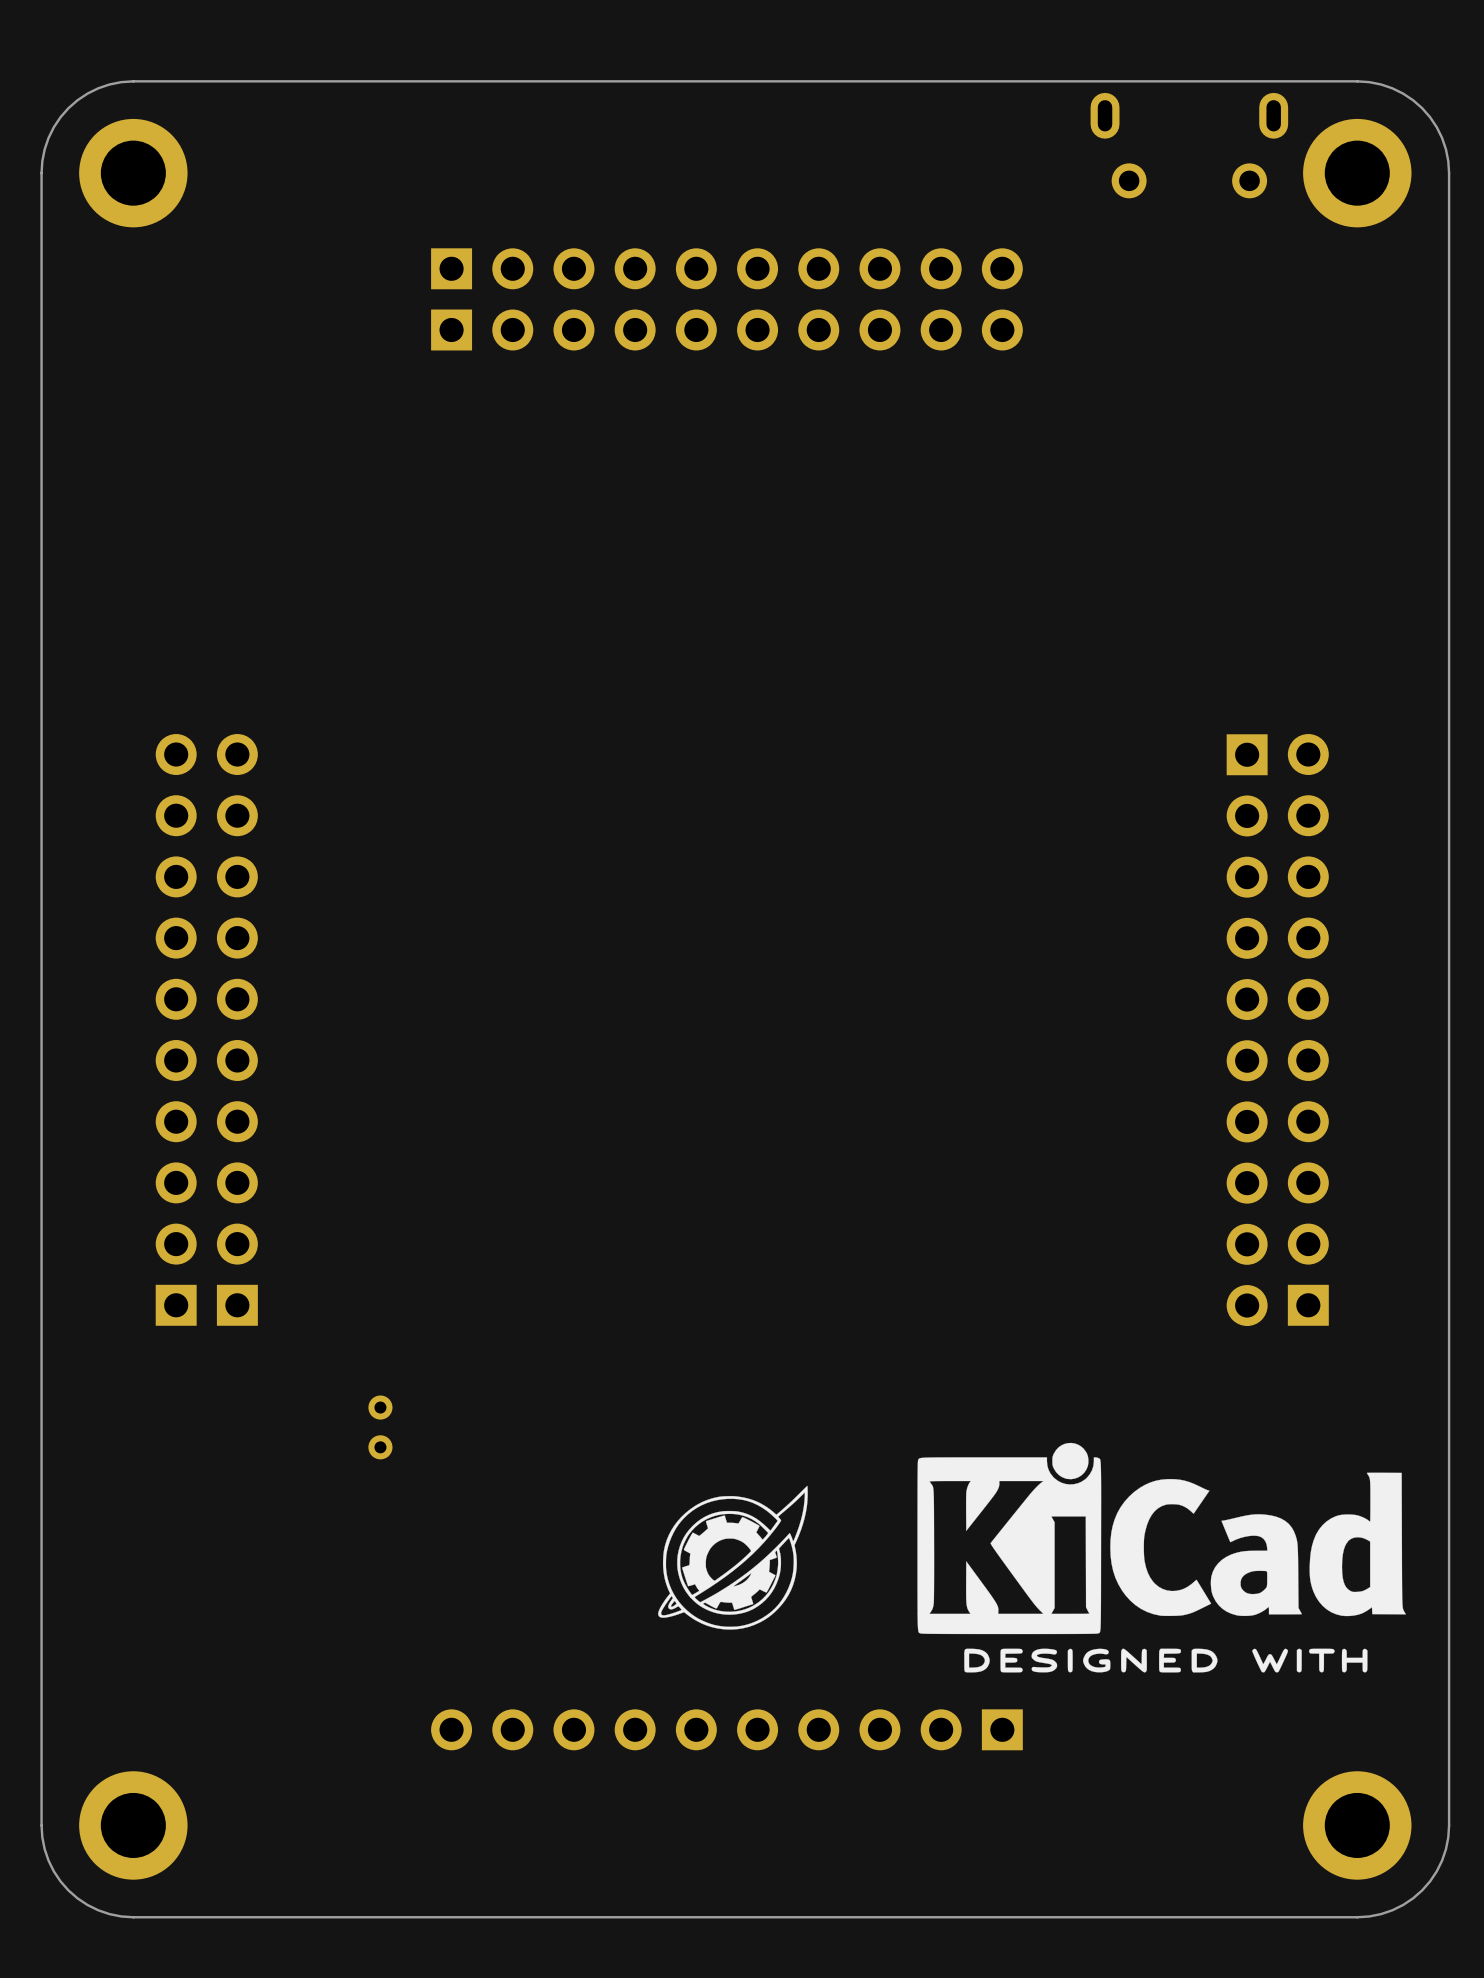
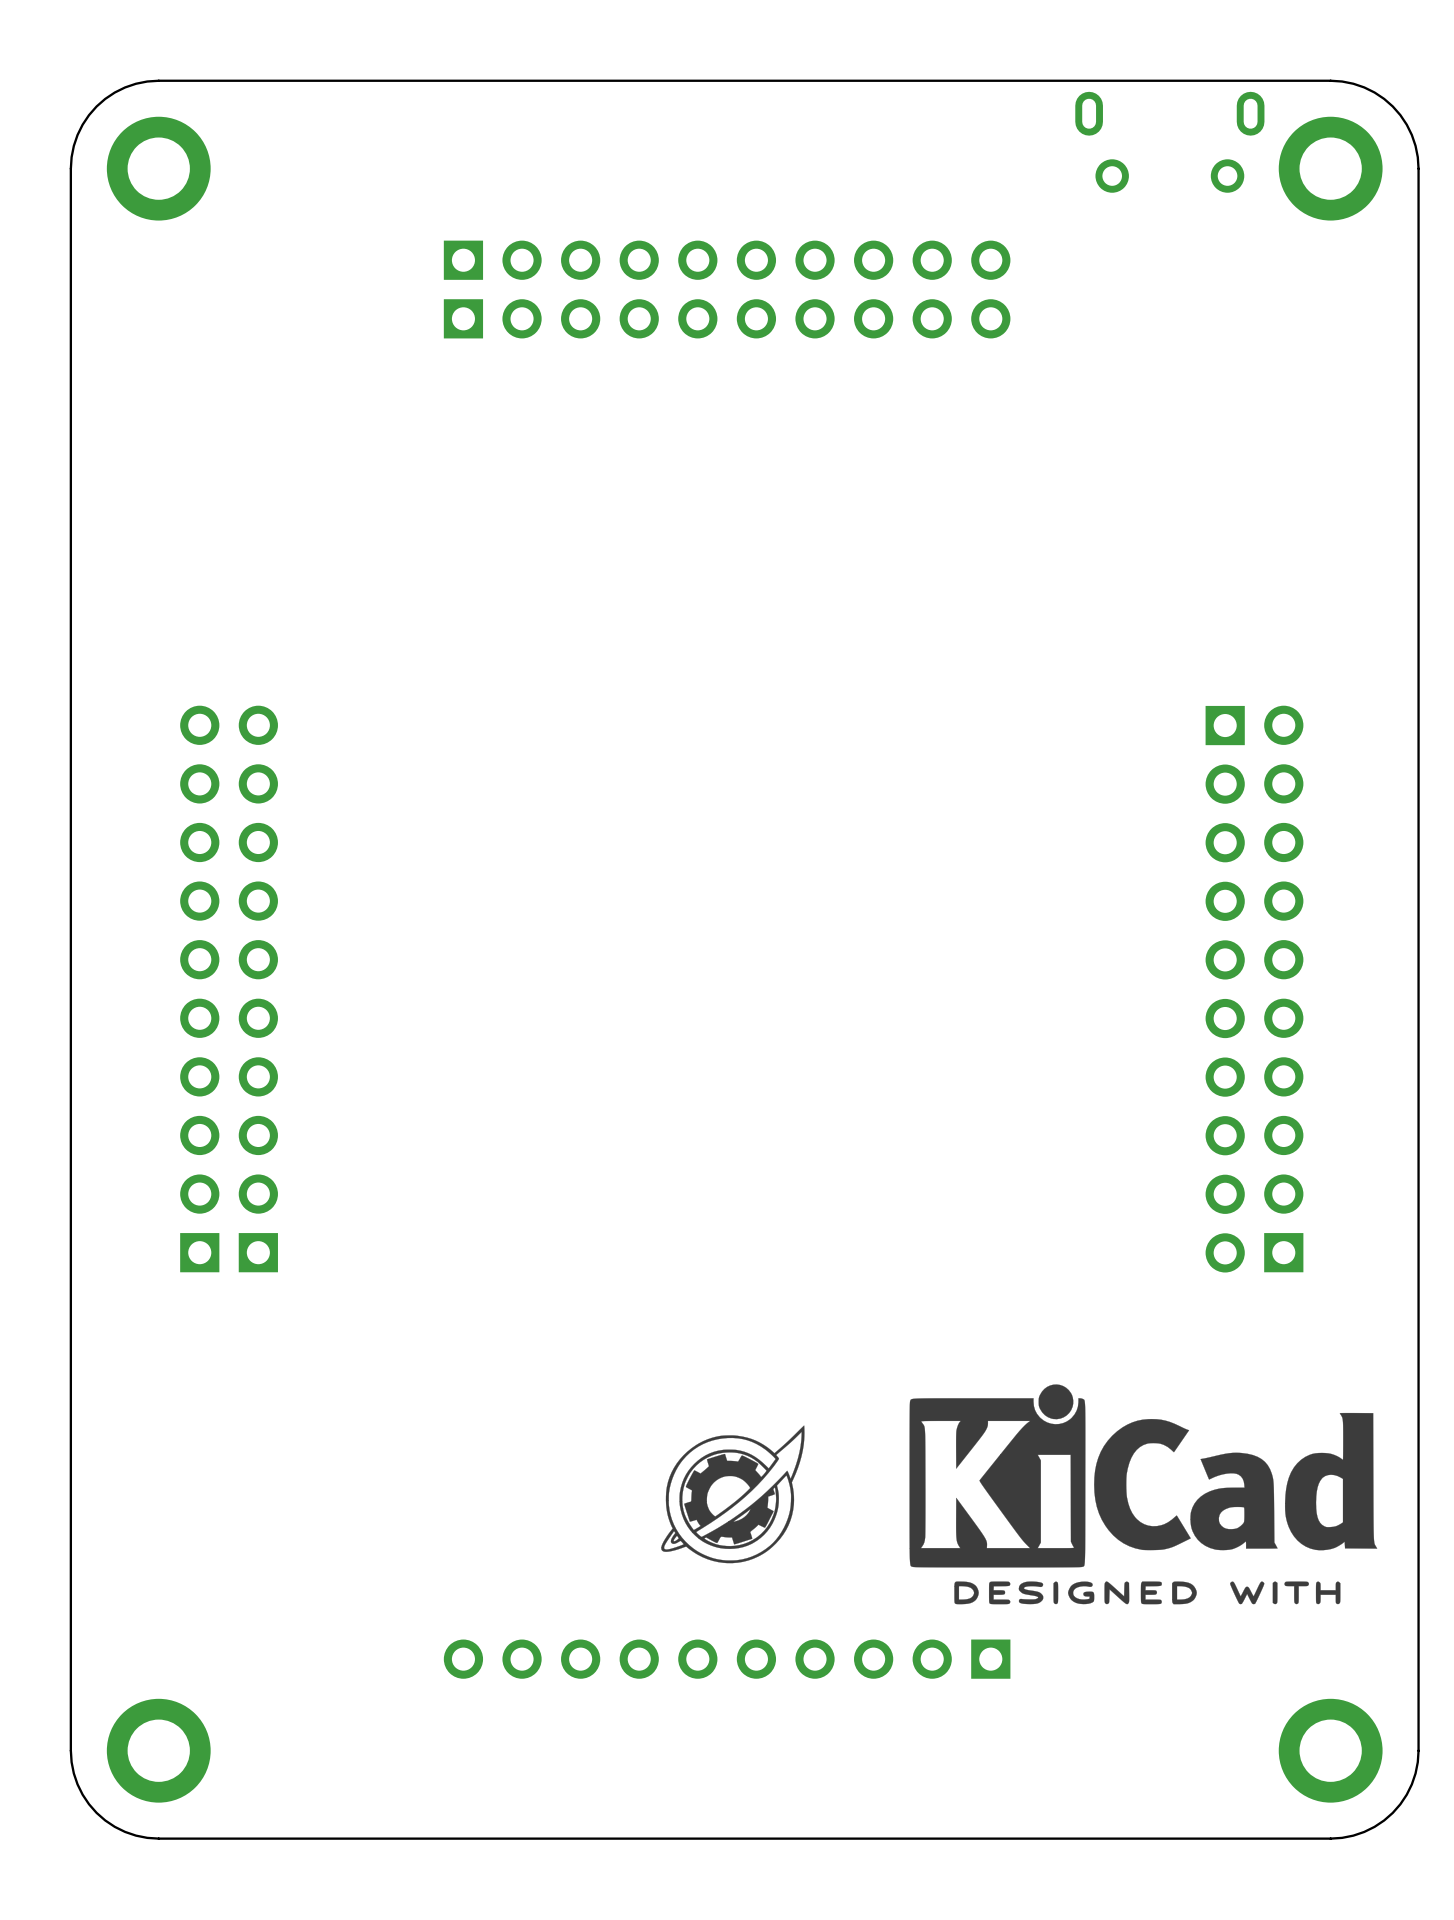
part: (380, 1427) -> none

